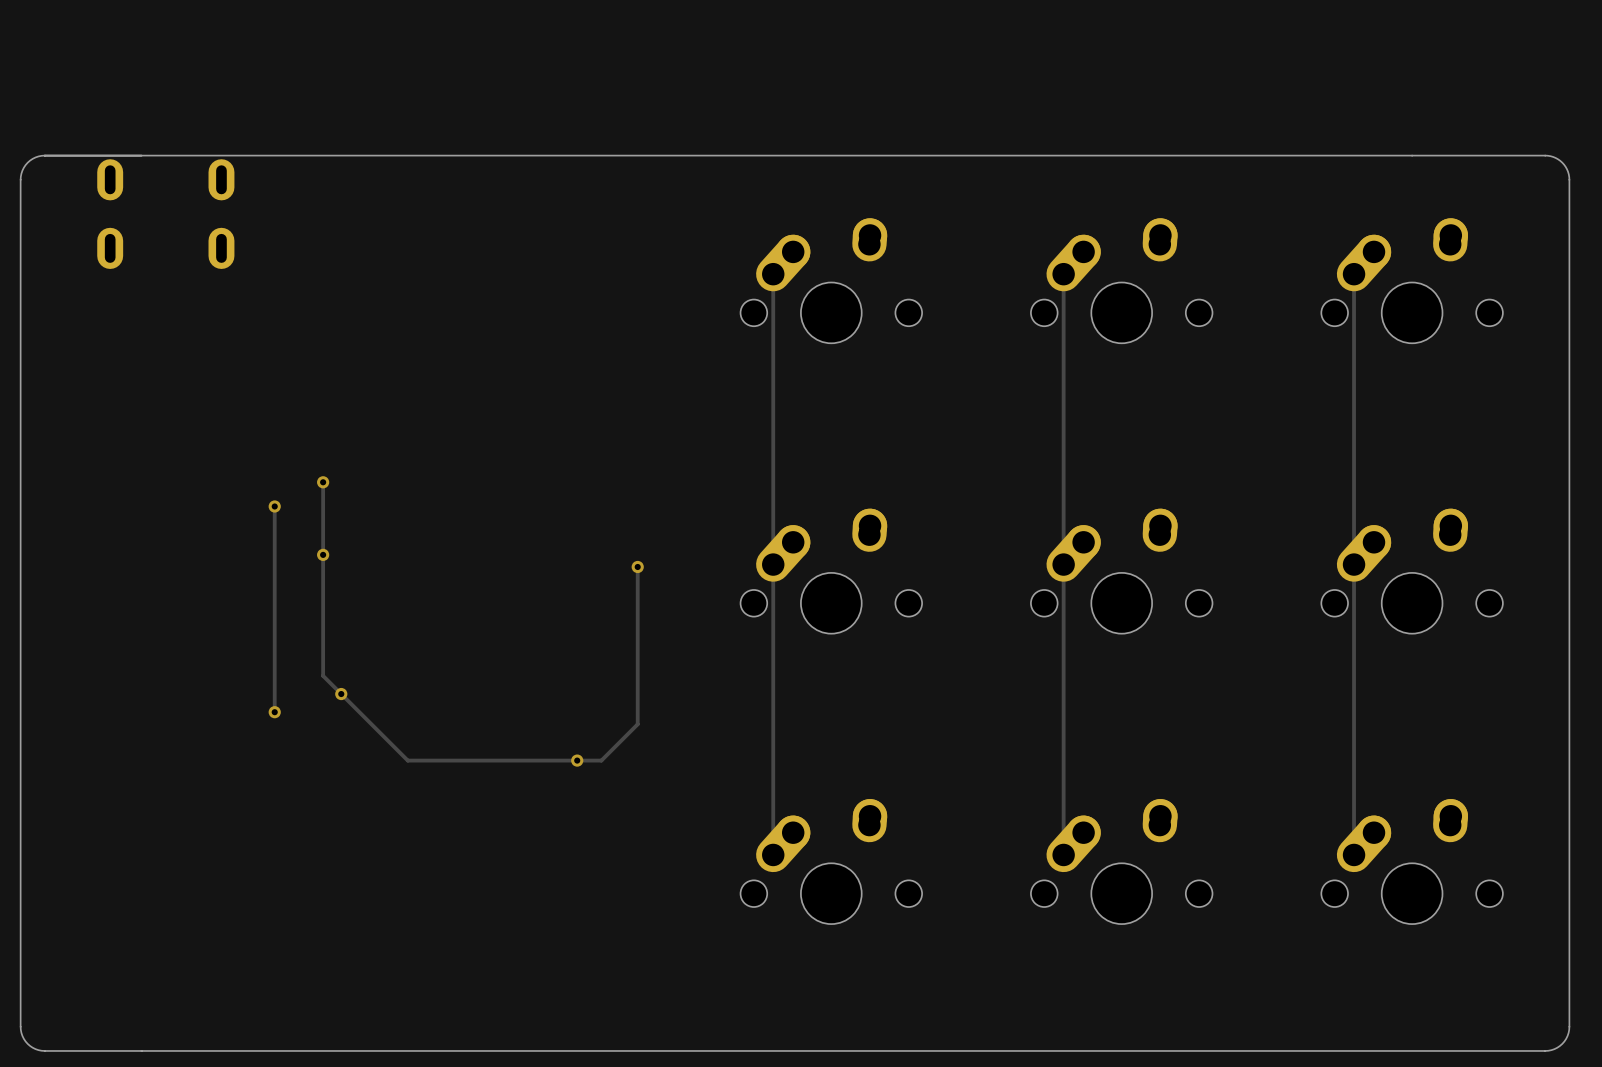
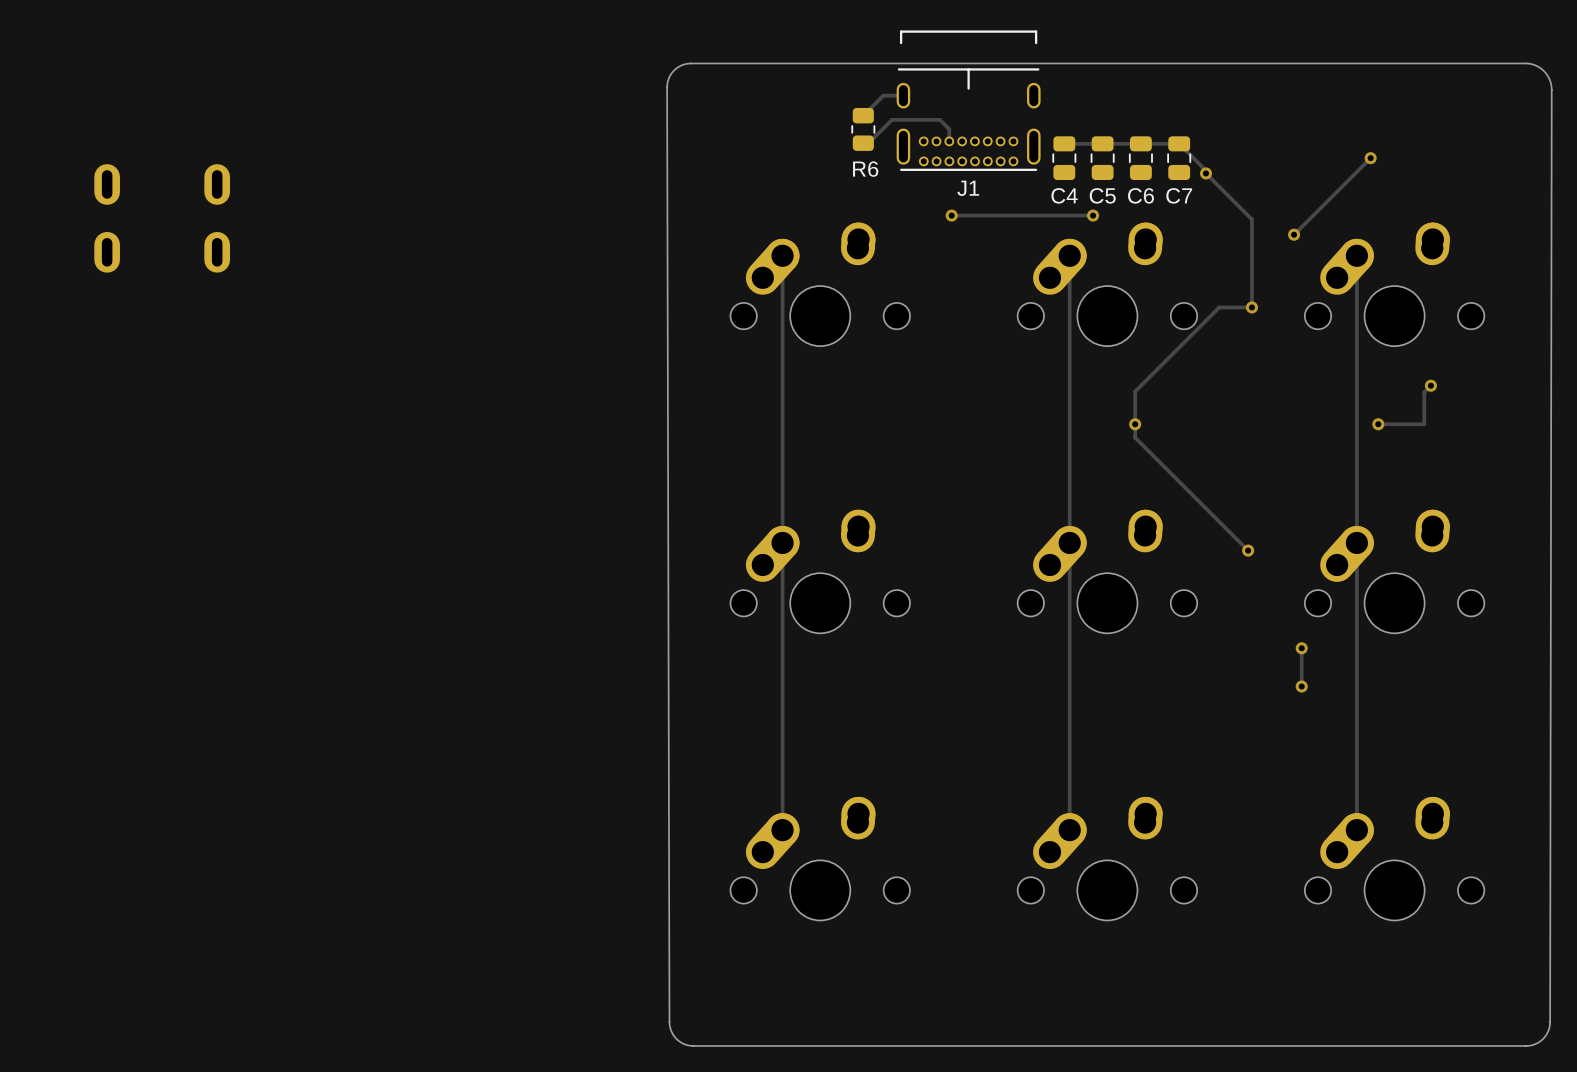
track: none -> (903, 95) (883, 95) (863, 115)
J1: none -> (968, 100)
R6: none -> (863, 129)
track: none -> (949, 141) (949, 129) (939, 119) (892, 119) (868, 143) (863, 143)
track: none -> (1064, 143) (1179, 143) (1251, 219) (1251, 307) (1219, 307) (1135, 391) (1135, 437) (1248, 550)
C4: none -> (1064, 158)
C5: none -> (1102, 158)
C6: none -> (1140, 158)
C7: none -> (1179, 158)
track: none -> (1370, 158) (1294, 234)
via: none -> (1370, 158)
via: none -> (1206, 173)
track: none -> (951, 215) (1093, 215)
via: none -> (951, 215)
via: none -> (1093, 215)
via: none -> (1294, 234)
track: (773, 274) (773, 854) -> (782, 255) (782, 830)
track: (1063, 274) (1063, 854) -> (1069, 255) (1069, 830)
track: (1354, 274) (1354, 854) -> (1356, 255) (1356, 830)
via: none -> (1251, 307)
track: none -> (1430, 385) (1424, 392) (1424, 424) (1378, 424)
via: none -> (1430, 385)
via: none -> (1135, 424)
via: none -> (1378, 424)
track: (323, 482) (323, 675) (407, 760) (601, 760) (637, 724) (637, 566) -> none
via: (323, 482) -> none
track: (274, 506) (274, 712) -> none
via: (274, 506) -> none
via: none -> (1248, 550)
via: (323, 554) -> none
via: (637, 566) -> none
track: none -> (1301, 648) (1301, 686)
via: none -> (1301, 648)
via: none -> (1301, 686)
via: (341, 694) -> none
via: (274, 712) -> none
via: (577, 760) -> none
board edge: (1569, 1026) (1569, 179) (1565, 166) (1558, 159) (1545, 155) (44, 155) (30, 160) (23, 167) (20, 179) (20, 1026) (25, 1041) (32, 1047) (44, 1050) (703, 1050) -> (1550, 1022) (1551, 89) (1549, 80) (1544, 72) (1537, 66) (1527, 63) (691, 63) (681, 65) (674, 70) (668, 78) (667, 87) (669, 1022) (671, 1031) (676, 1038) (684, 1044) (693, 1045)

